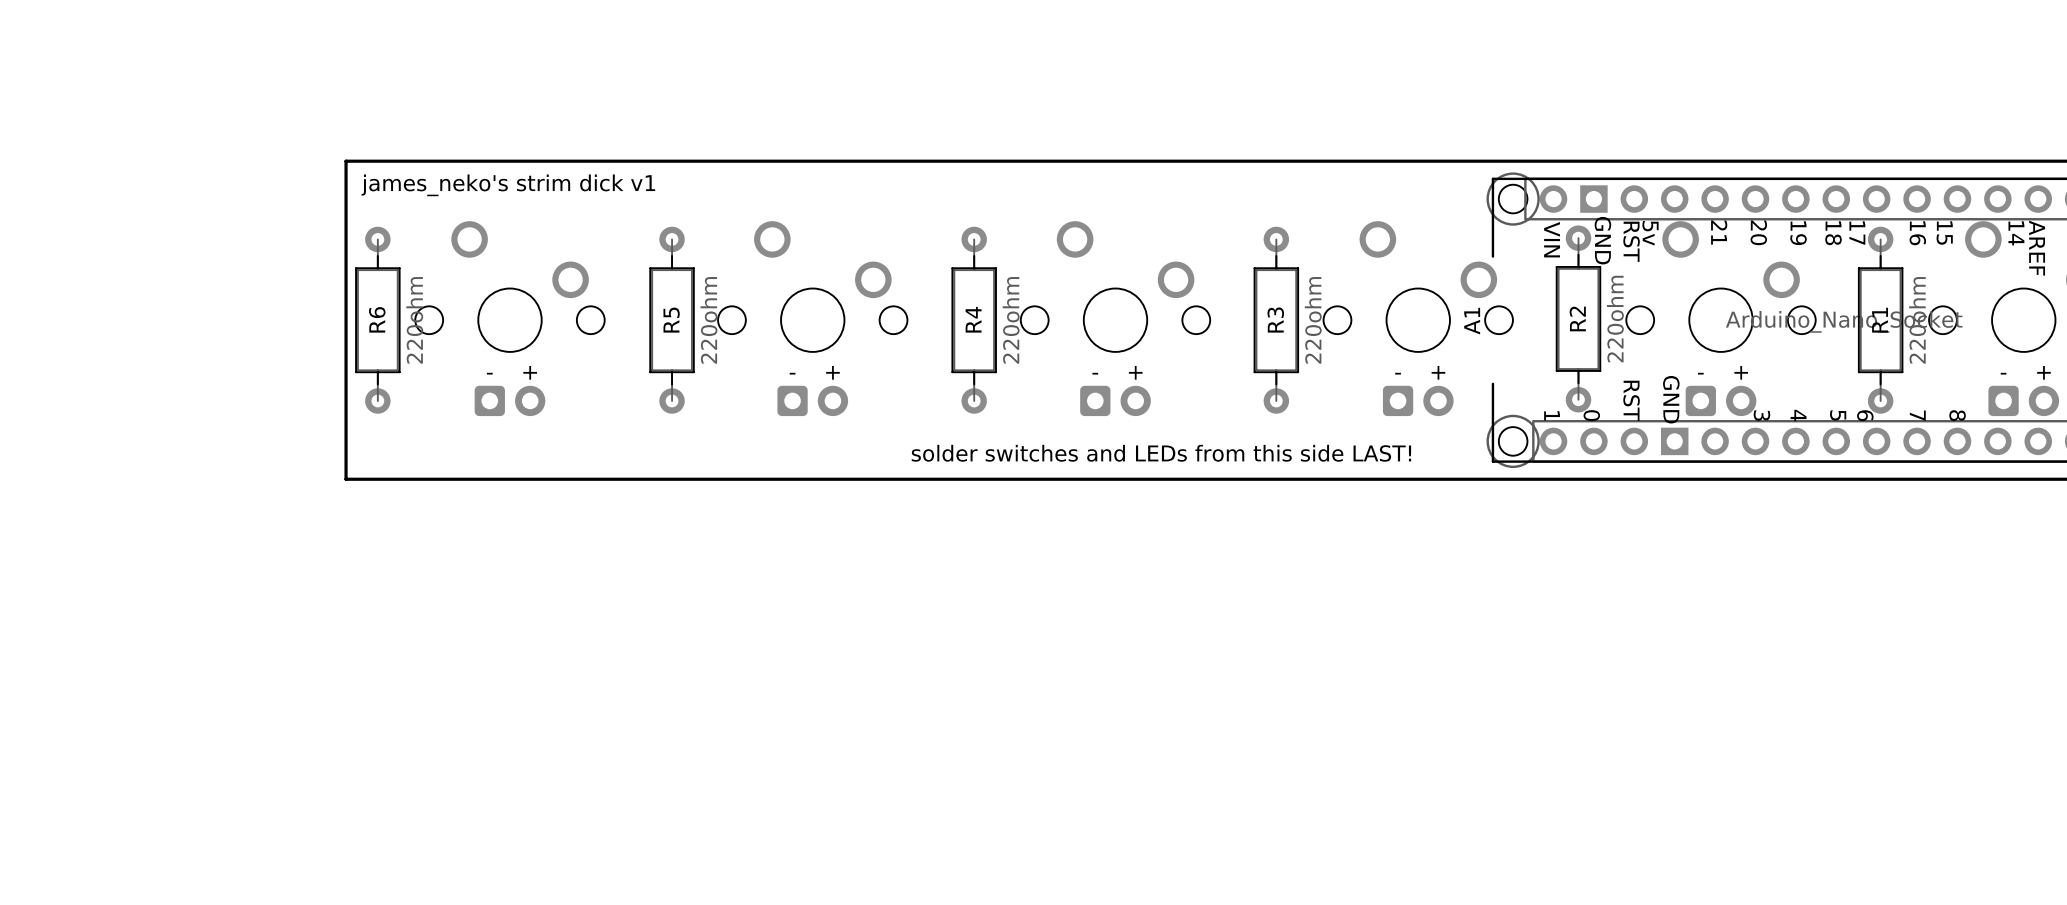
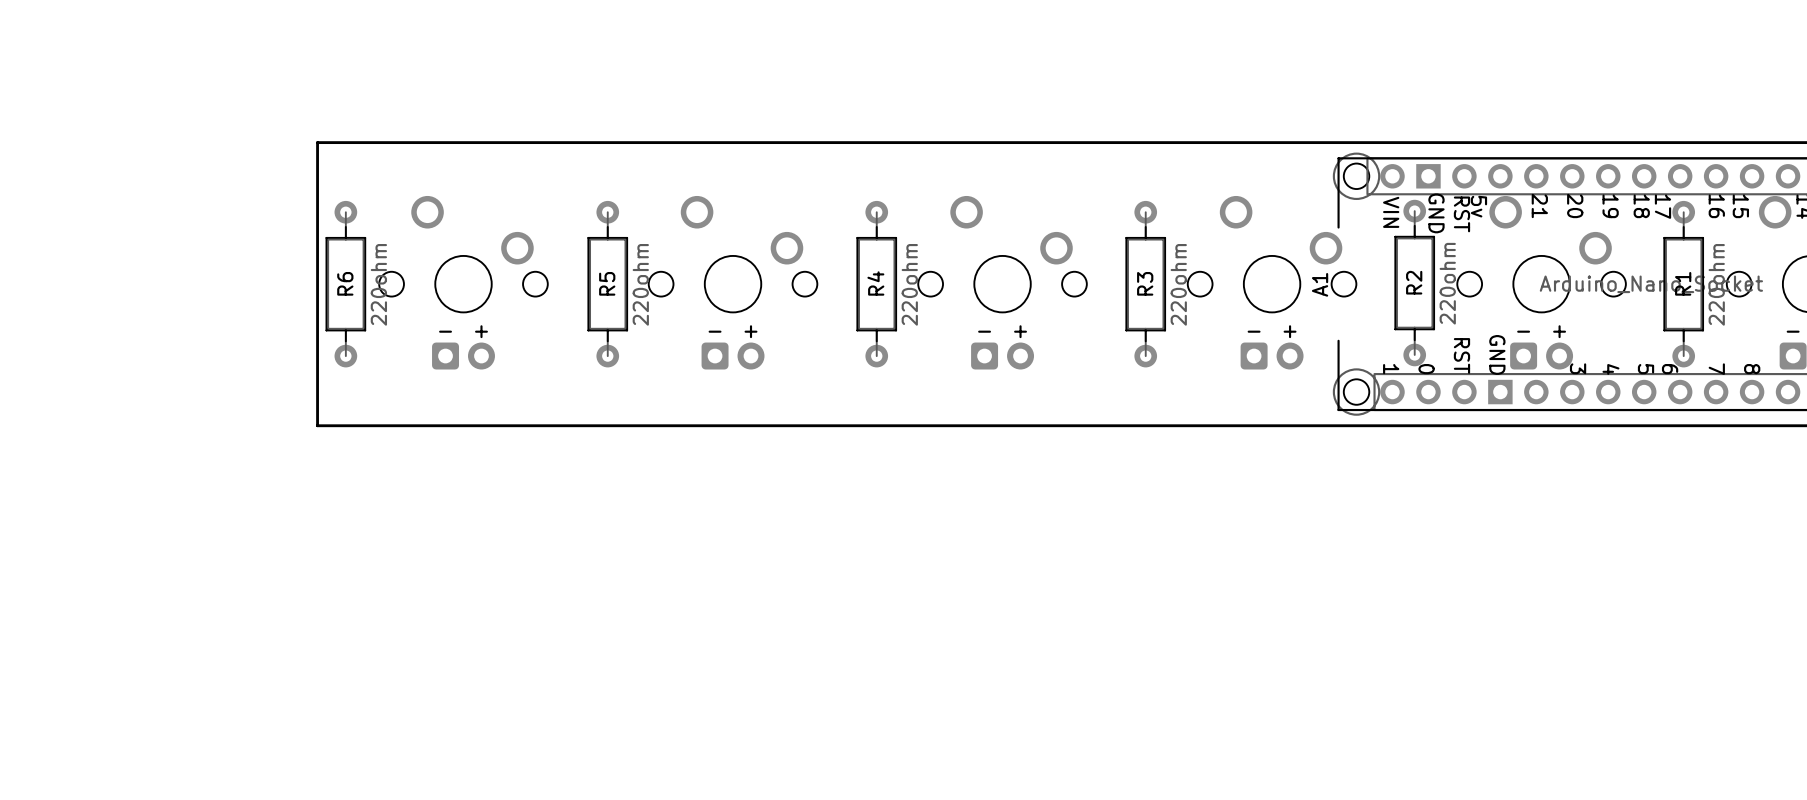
text: james_neko's strim dick v1 (508, 185) -> none
text: solder switches and LEDs from this side LAST! (1161, 453) -> none

